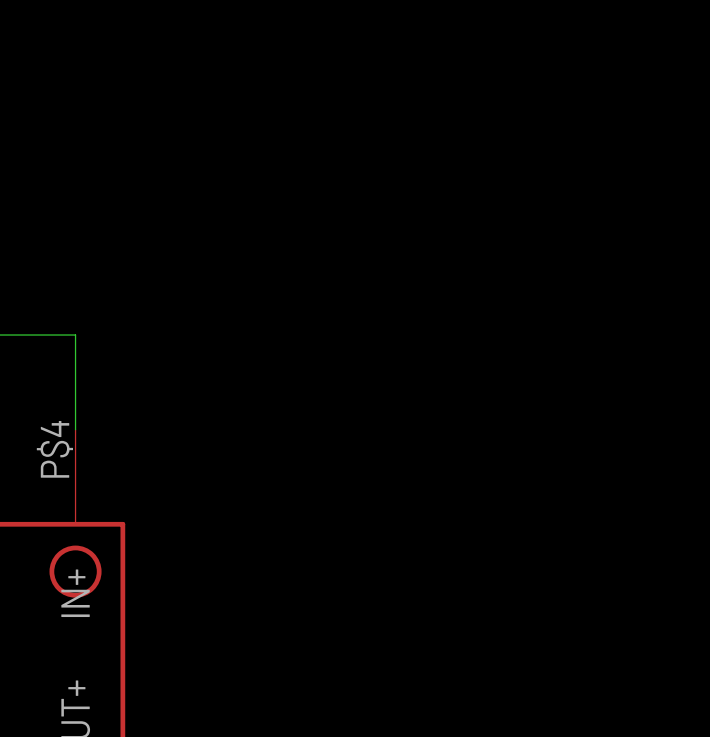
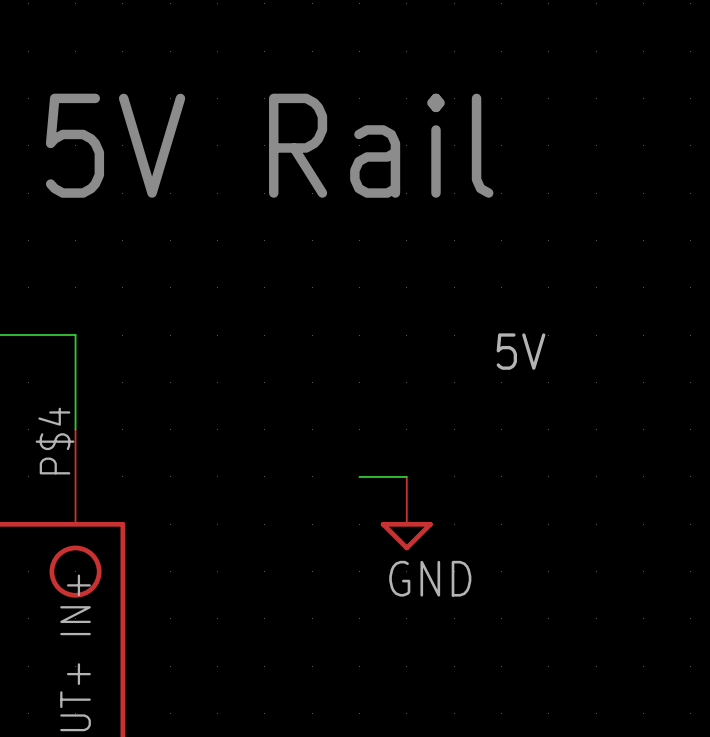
text: none -> 5V Rail (269, 145)
label: none -> 5V (521, 351)
wire: none -> (359, 476) (406, 476)
power symbol: none -> GND (406, 513)

